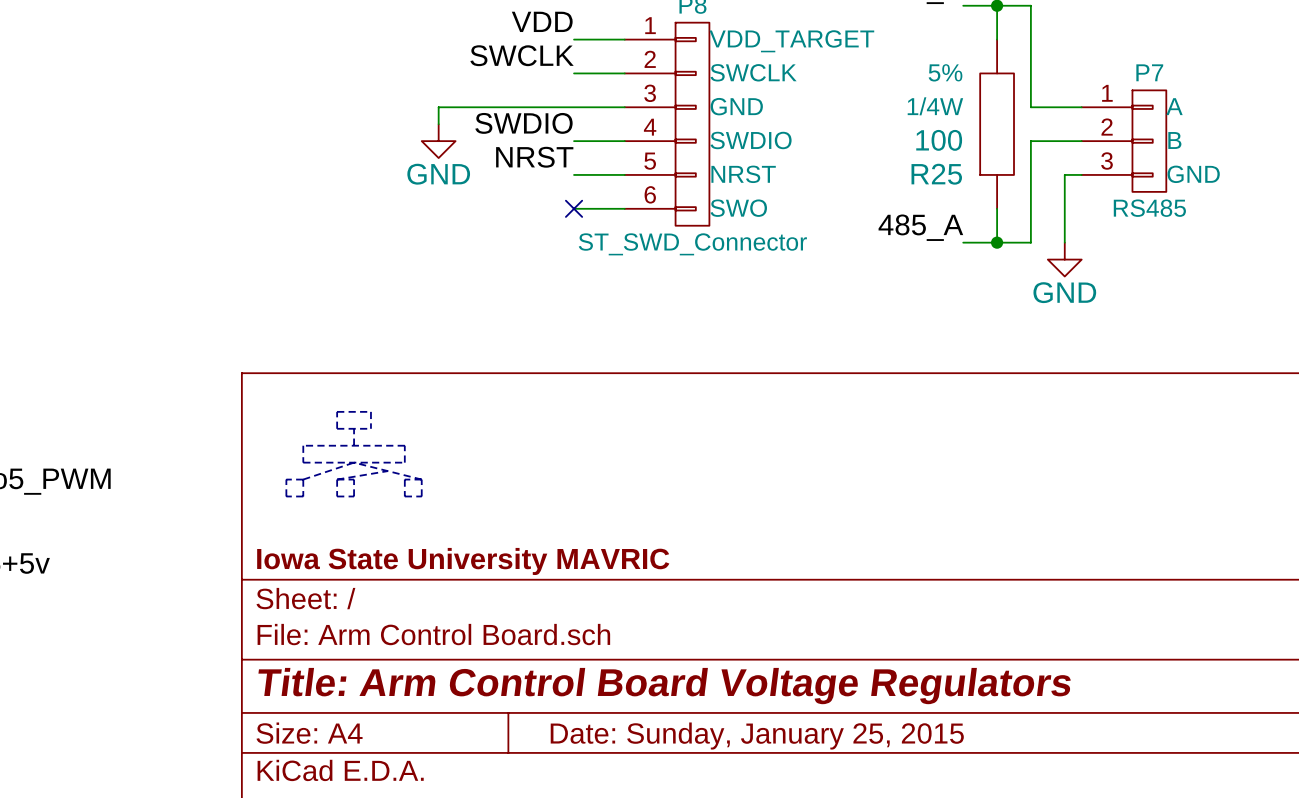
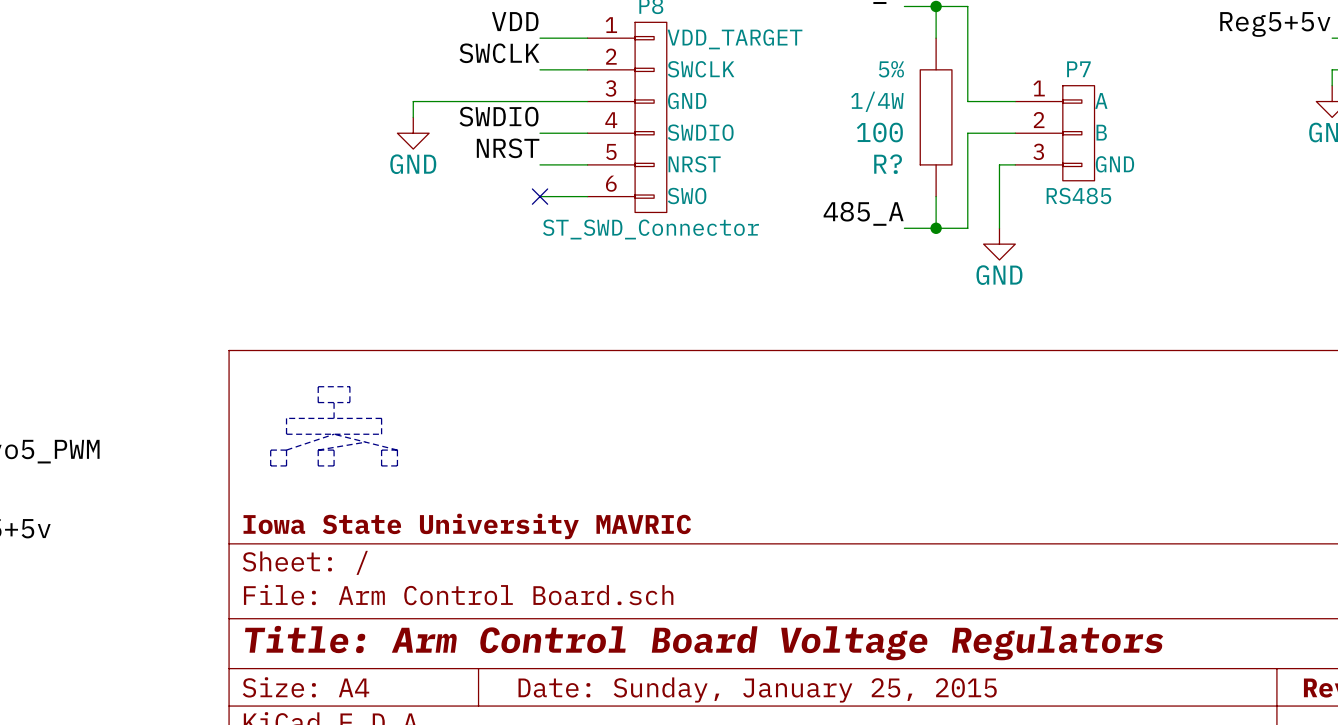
R25 name: R25 (936, 174) -> R? (888, 164)

